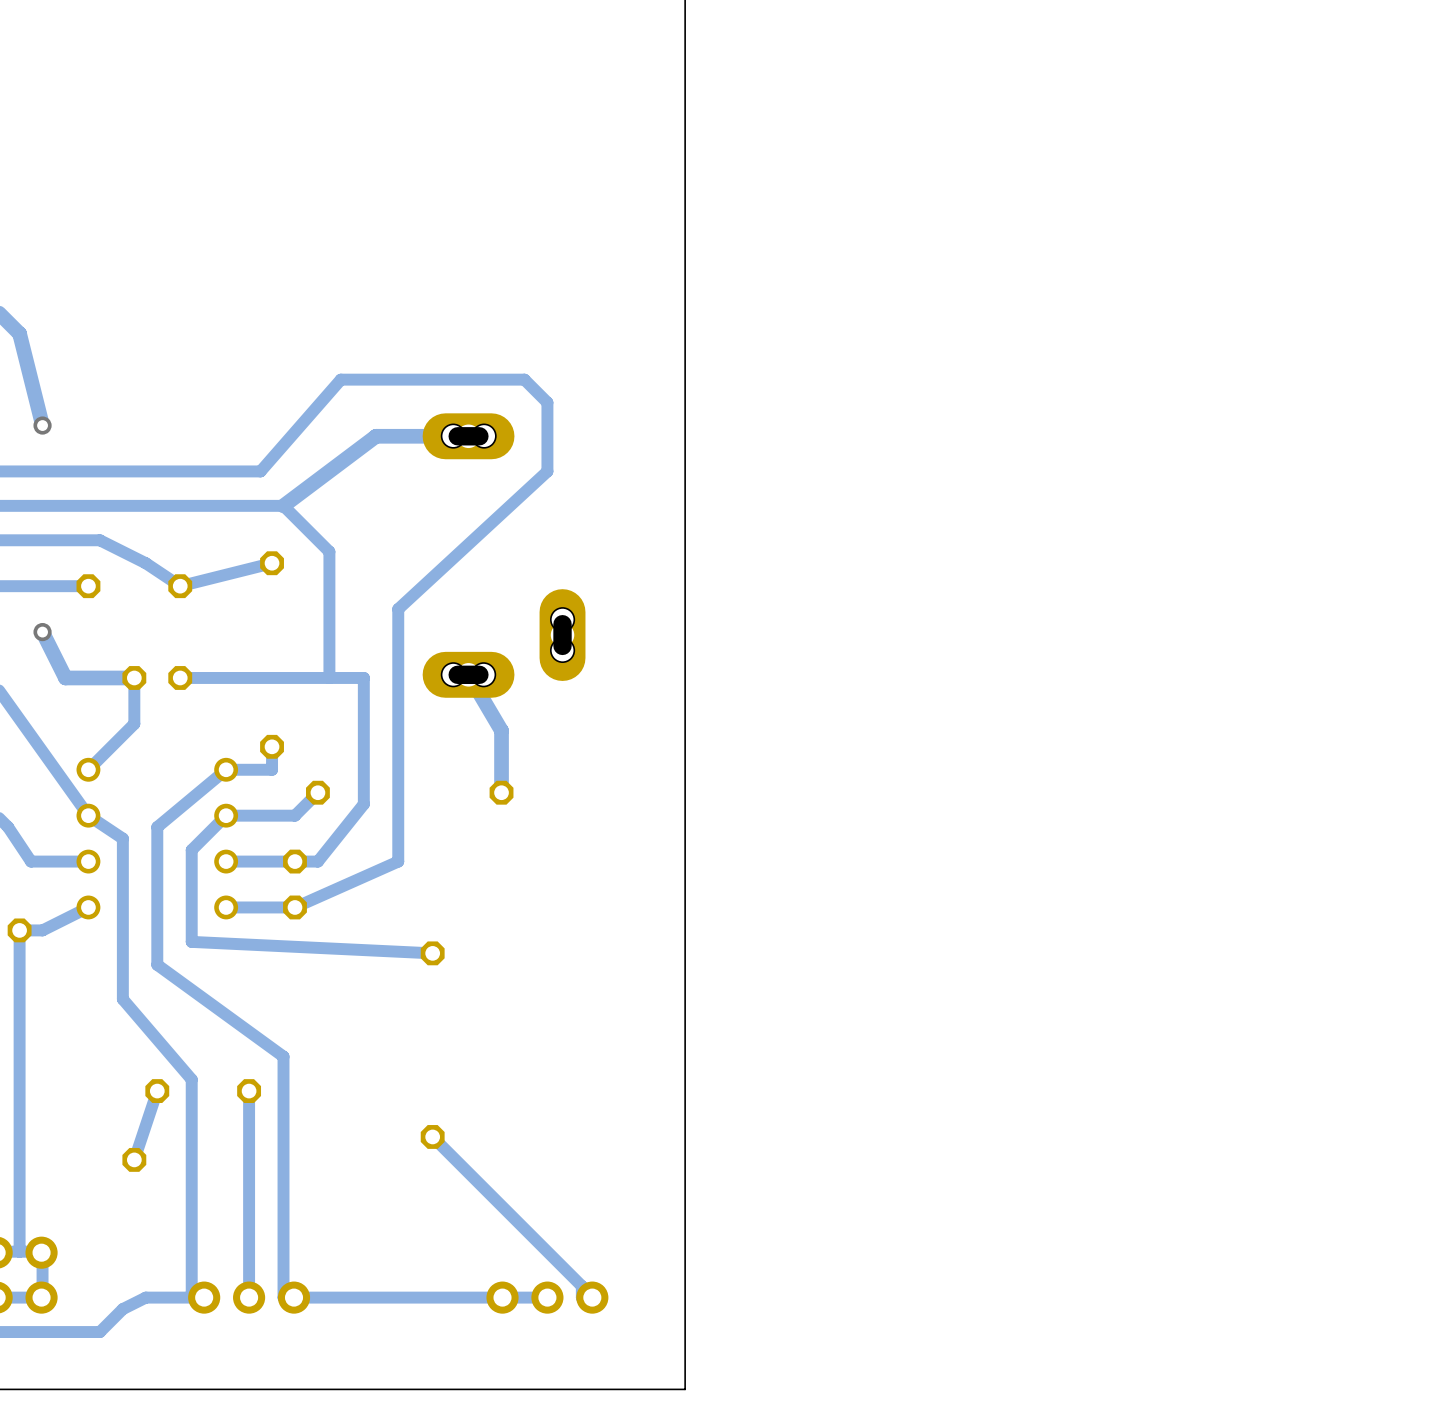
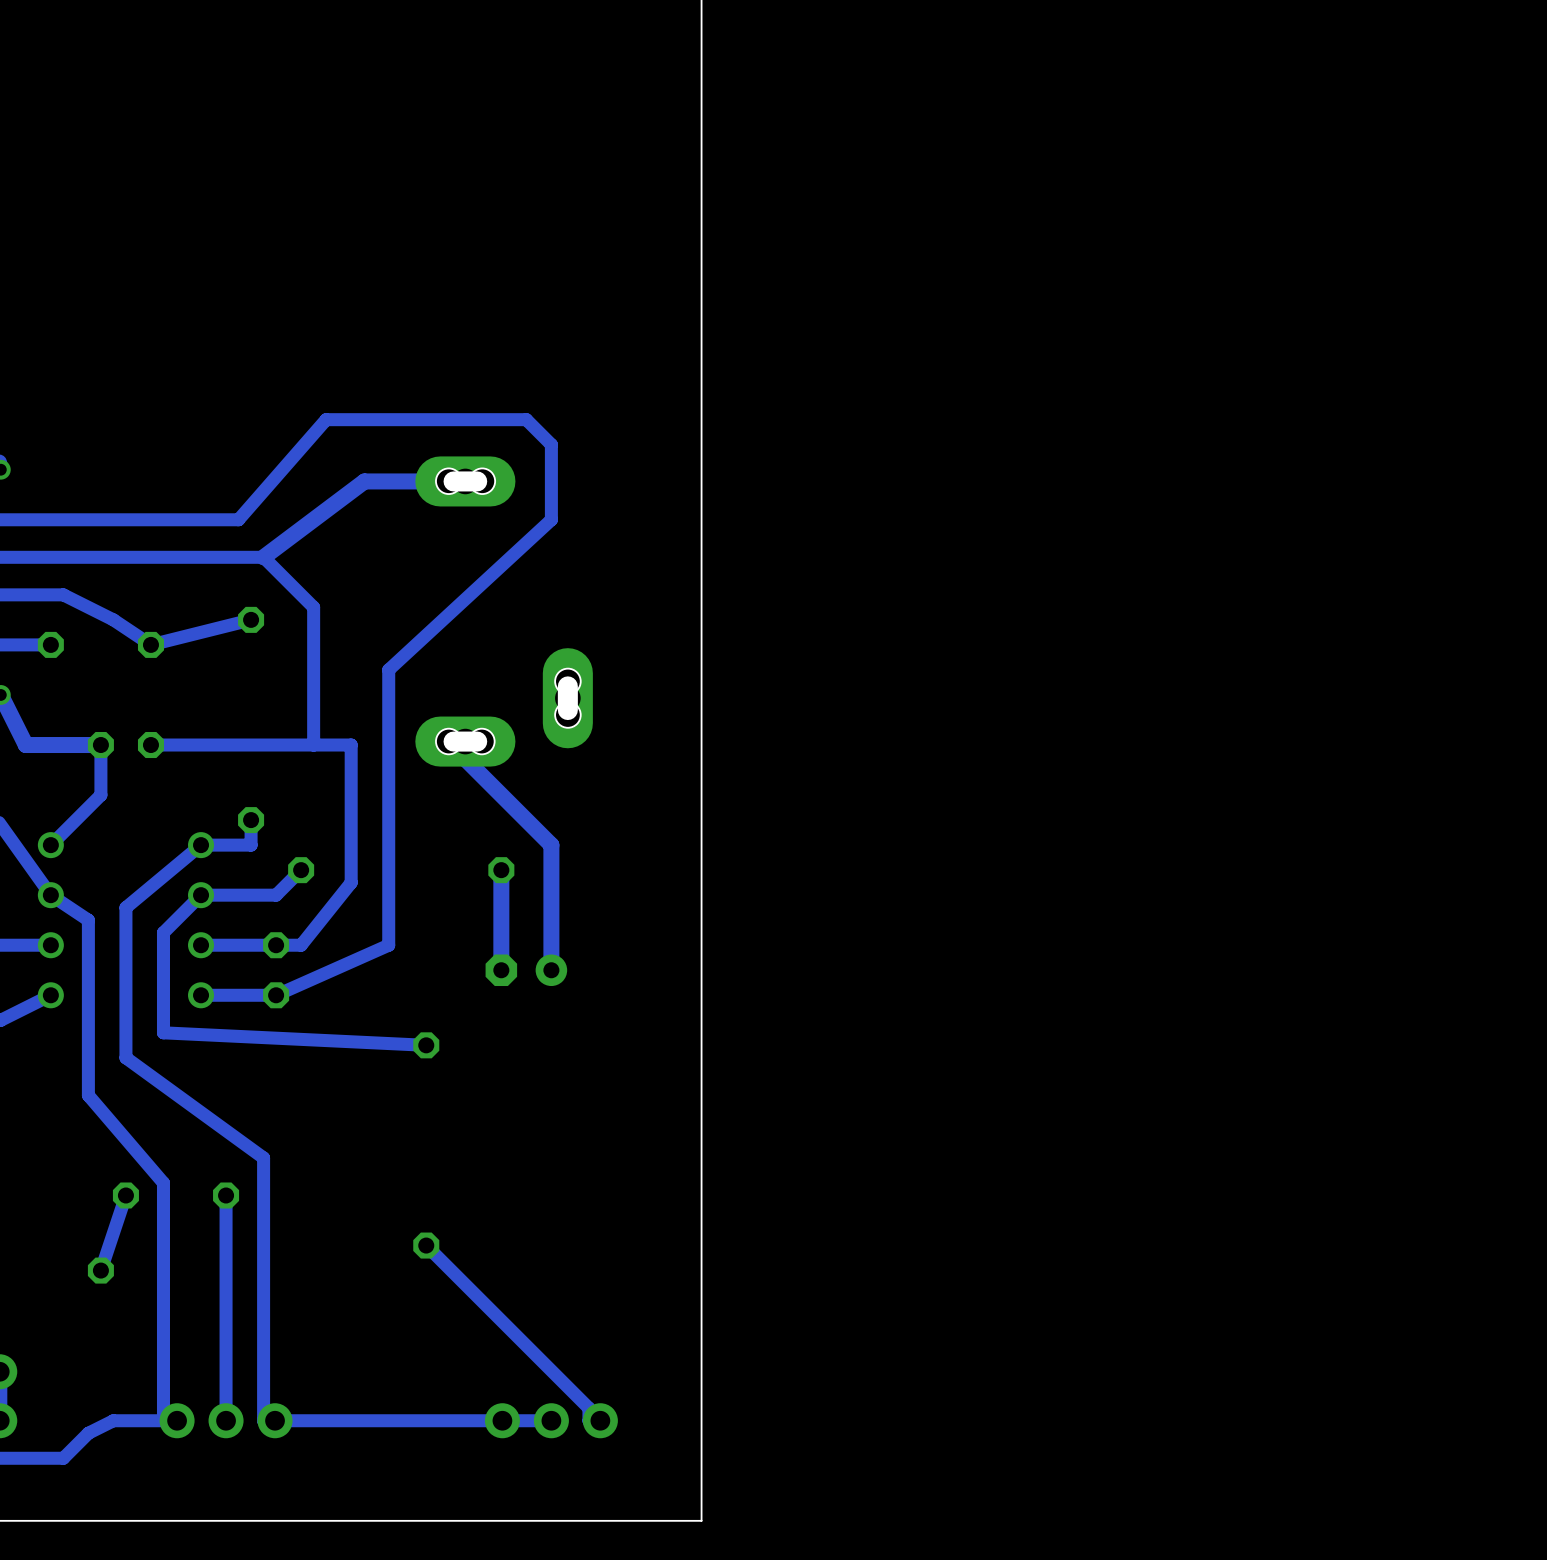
track: (468, 674) (501, 730) (501, 792) -> (465, 741) (465, 759) (551, 845) (551, 970)
track: none -> (501, 870) (501, 970)
part: none -> (526, 970)

